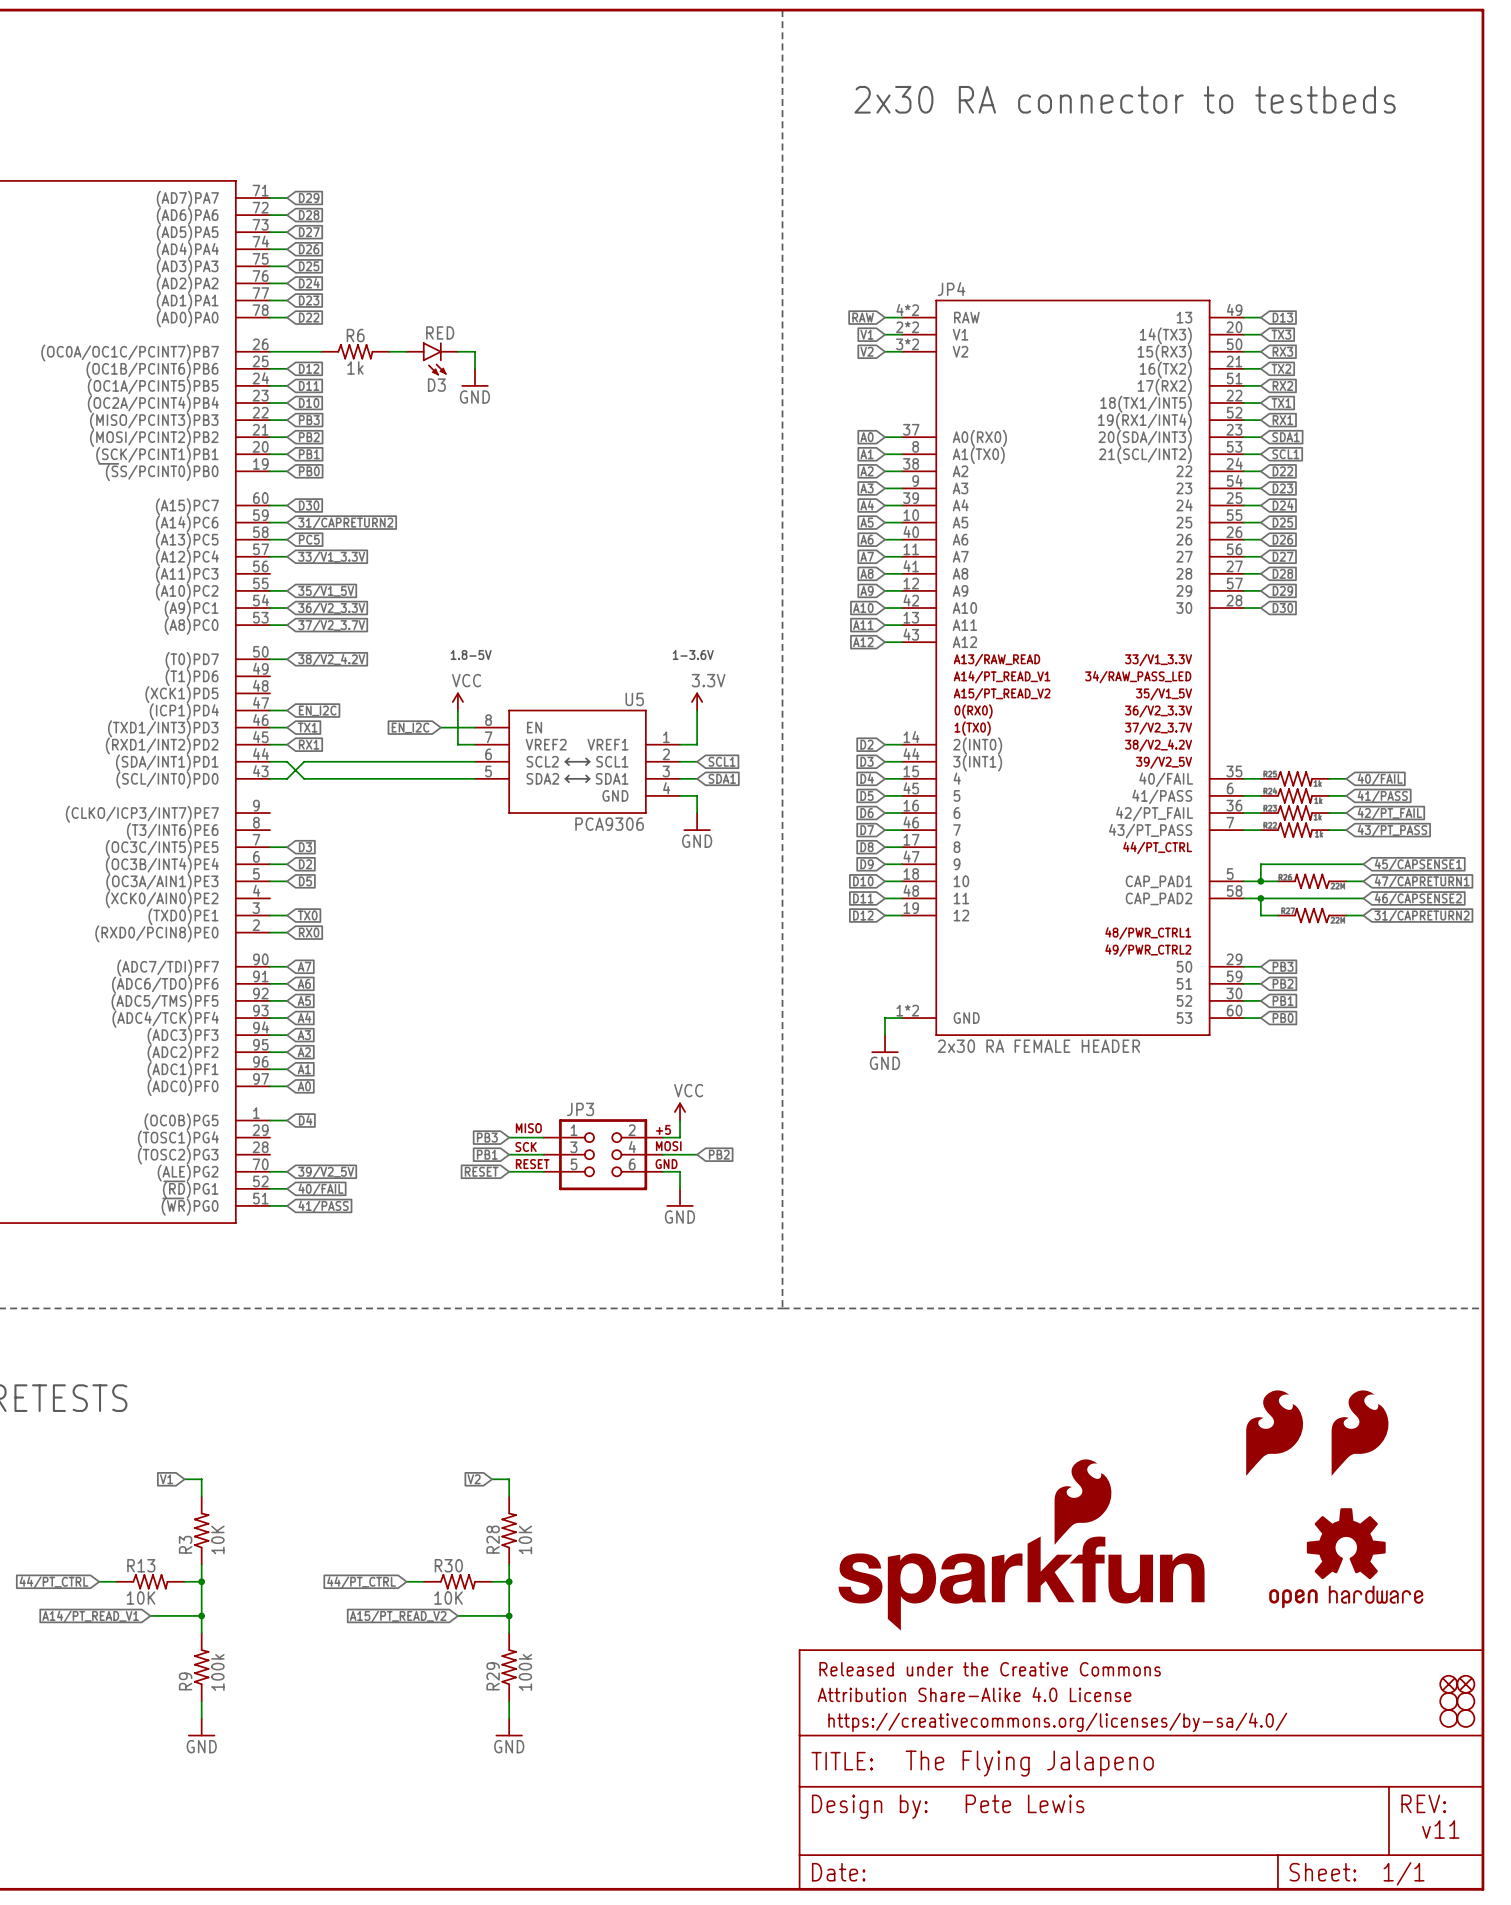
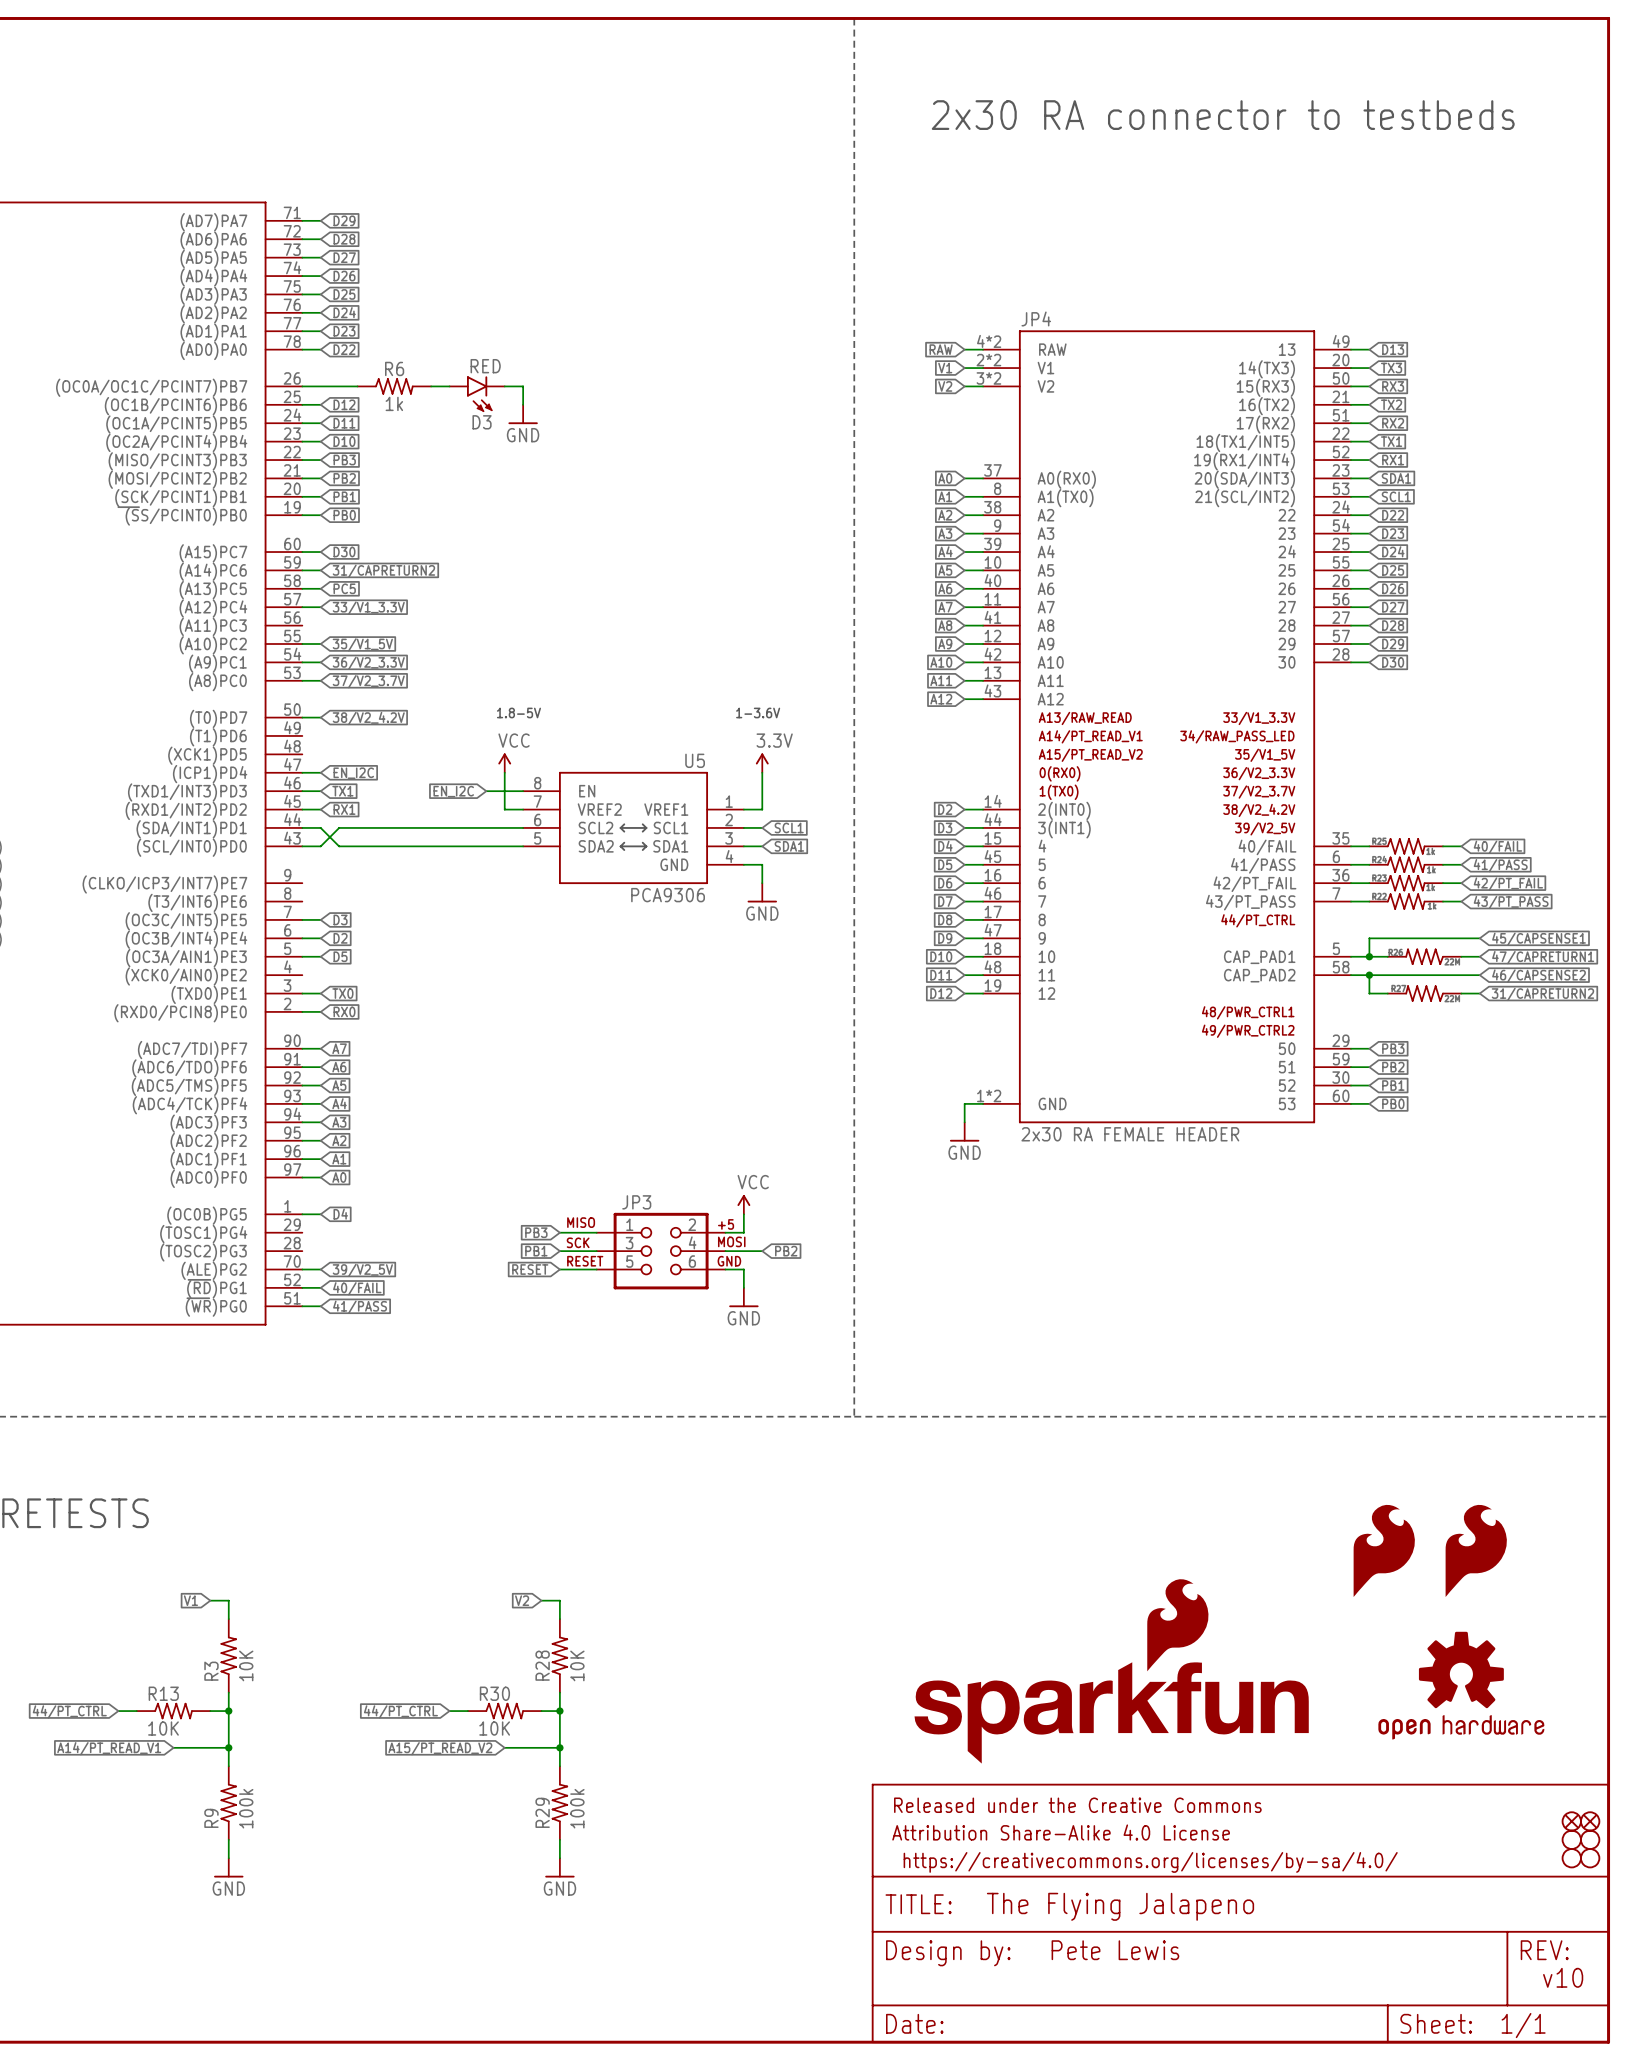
text: v11 (1440, 1829) -> v10 (1563, 1977)

